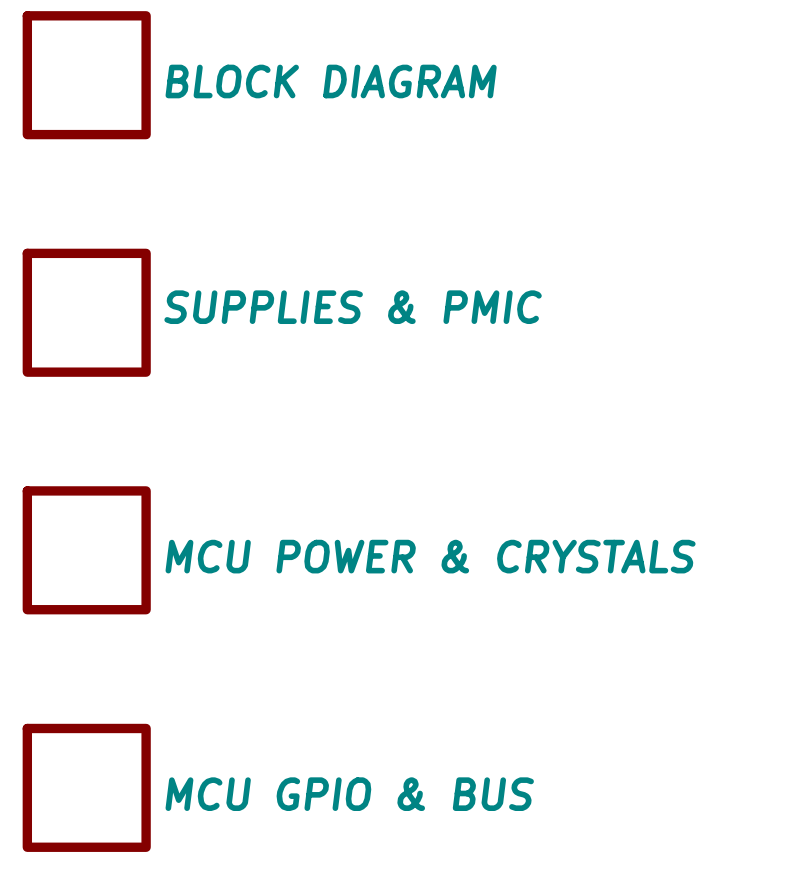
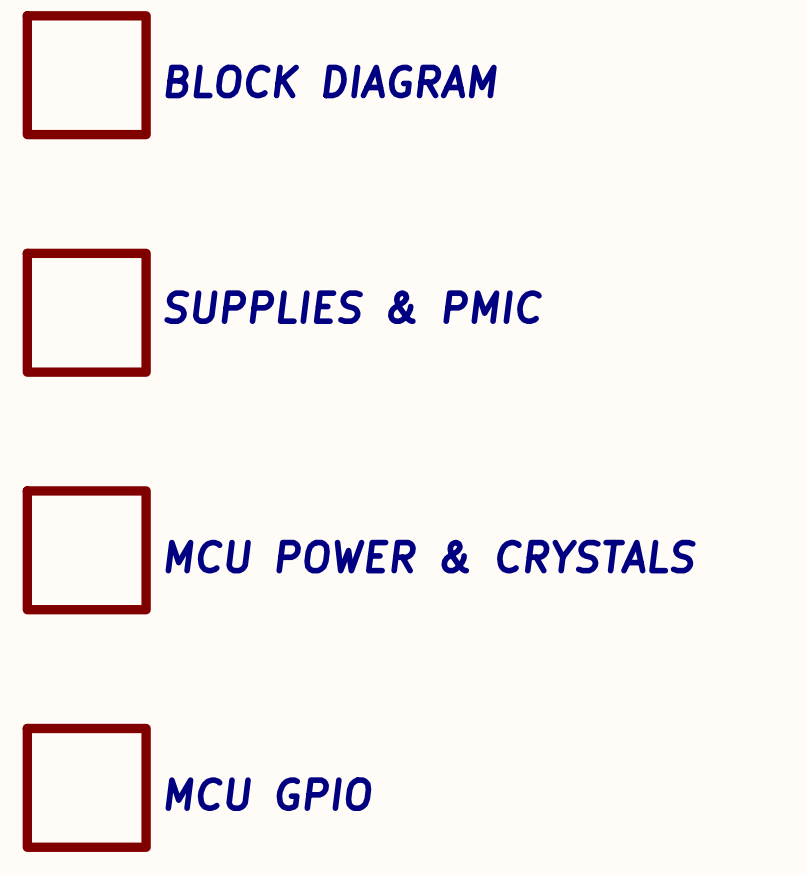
sheet MCU GPIO & BUS name: MCU GPIO & BUS (349, 794) -> MCU GPIO (268, 794)

